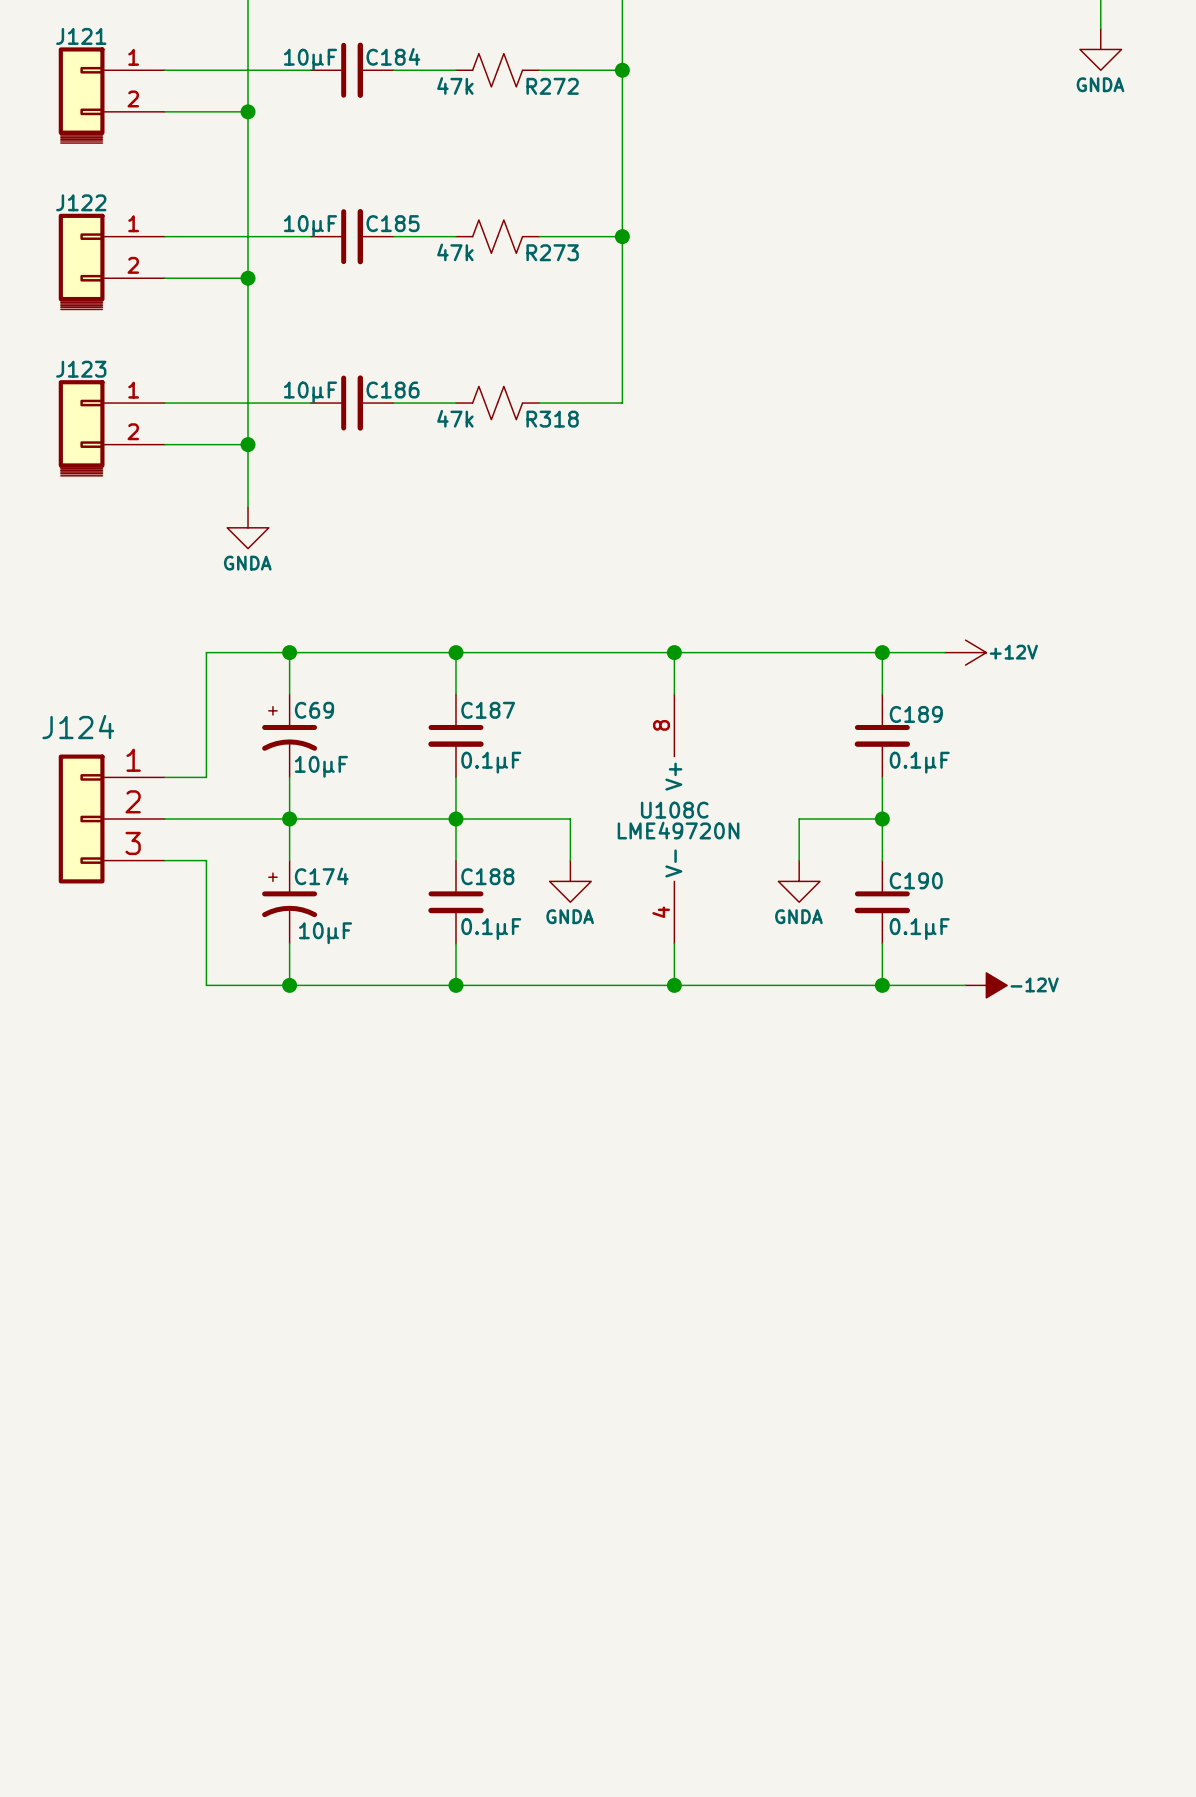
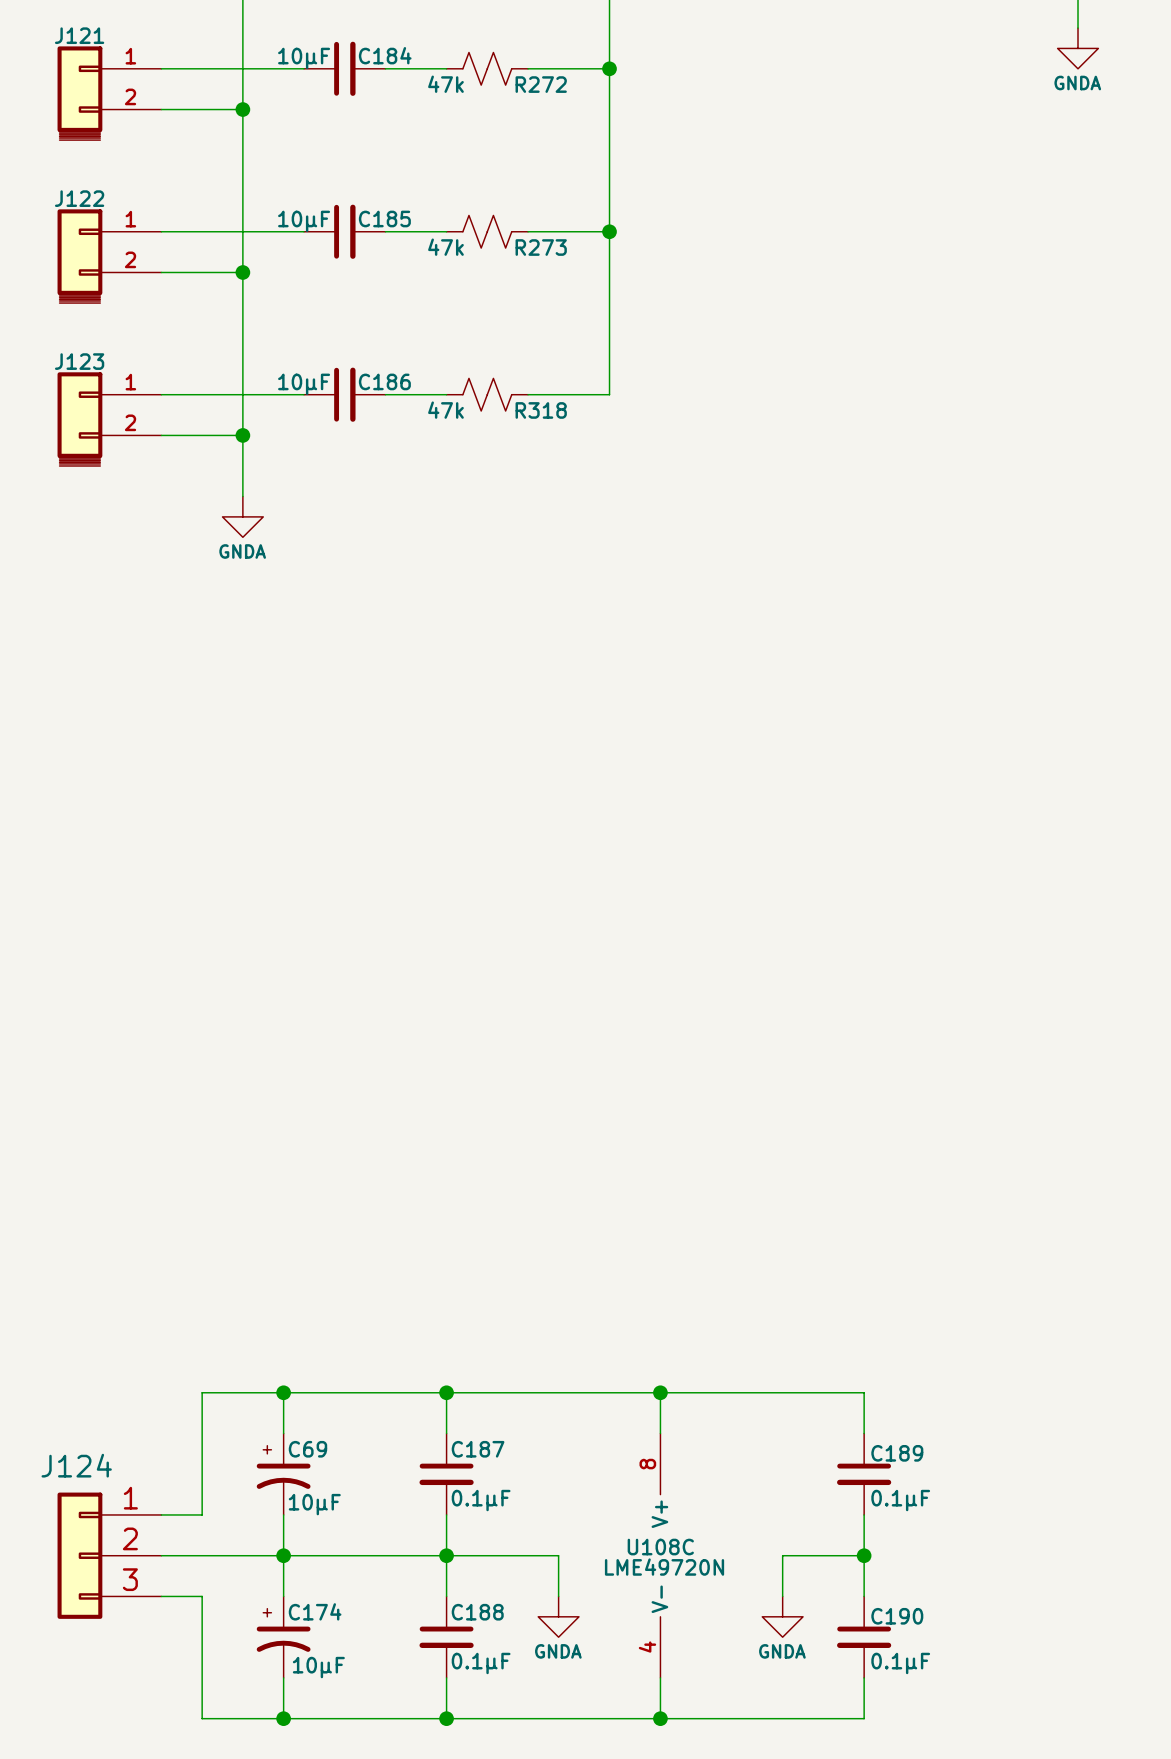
wire: (289, 652) (289, 694) -> none
junction: (289, 652) -> none
wire: (455, 652) (455, 694) -> none
junction: (455, 652) -> none
wire: (674, 652) (674, 694) -> none
junction: (674, 652) -> none
wire: (882, 652) (882, 694) -> none
junction: (882, 652) -> none
wire: (944, 652) (206, 652) (206, 777) (164, 777) -> none
power symbol: +12V (965, 652) -> none
C69 position: (289, 735) -> (283, 1474)
C187 position: (455, 735) -> (446, 1474)
C189 position: (882, 735) -> (864, 1474)
wire: (289, 777) (289, 860) -> none
wire: (455, 777) (455, 860) -> none
wire: (882, 777) (882, 860) -> none
J124 position: (111, 819) -> (109, 1555)
wire: (164, 819) (570, 819) (570, 860) -> none
junction: (289, 819) -> none
junction: (455, 819) -> none
U108C position: (674, 819) -> (660, 1555)
wire: (882, 819) (799, 819) (799, 860) -> none
junction: (882, 819) -> none
wire: (164, 860) (206, 860) (206, 985) (965, 985) -> none
power symbol: GNDA (570, 881) -> none
power symbol: GNDA (799, 881) -> none
C174 position: (289, 902) -> (283, 1637)
C188 position: (455, 902) -> (446, 1637)
C190 position: (882, 902) -> (864, 1637)
wire: (289, 943) (289, 985) -> none
wire: (455, 943) (455, 985) -> none
wire: (674, 943) (674, 985) -> none
wire: (882, 943) (882, 985) -> none
junction: (289, 985) -> none
junction: (455, 985) -> none
junction: (674, 985) -> none
junction: (882, 985) -> none
power symbol: -12V (986, 985) -> none
wire: none -> (283, 1392) (283, 1433)
junction: none -> (283, 1392)
wire: none -> (446, 1392) (446, 1433)
junction: none -> (446, 1392)
wire: none -> (660, 1392) (660, 1433)
junction: none -> (660, 1392)
wire: none -> (864, 1433) (864, 1392) (202, 1392) (202, 1514) (161, 1514)
wire: none -> (283, 1514) (283, 1596)
wire: none -> (446, 1514) (446, 1596)
wire: none -> (864, 1514) (864, 1596)
wire: none -> (161, 1555) (558, 1555) (558, 1596)
junction: none -> (283, 1555)
junction: none -> (446, 1555)
wire: none -> (864, 1555) (782, 1555) (782, 1596)
junction: none -> (864, 1555)
wire: none -> (161, 1596) (202, 1596) (202, 1718) (864, 1718) (864, 1677)
power symbol: none -> GNDA (558, 1616)
power symbol: none -> GNDA (782, 1616)
wire: none -> (283, 1677) (283, 1718)
wire: none -> (446, 1677) (446, 1718)
wire: none -> (660, 1677) (660, 1718)
junction: none -> (283, 1718)
junction: none -> (446, 1718)
junction: none -> (660, 1718)

